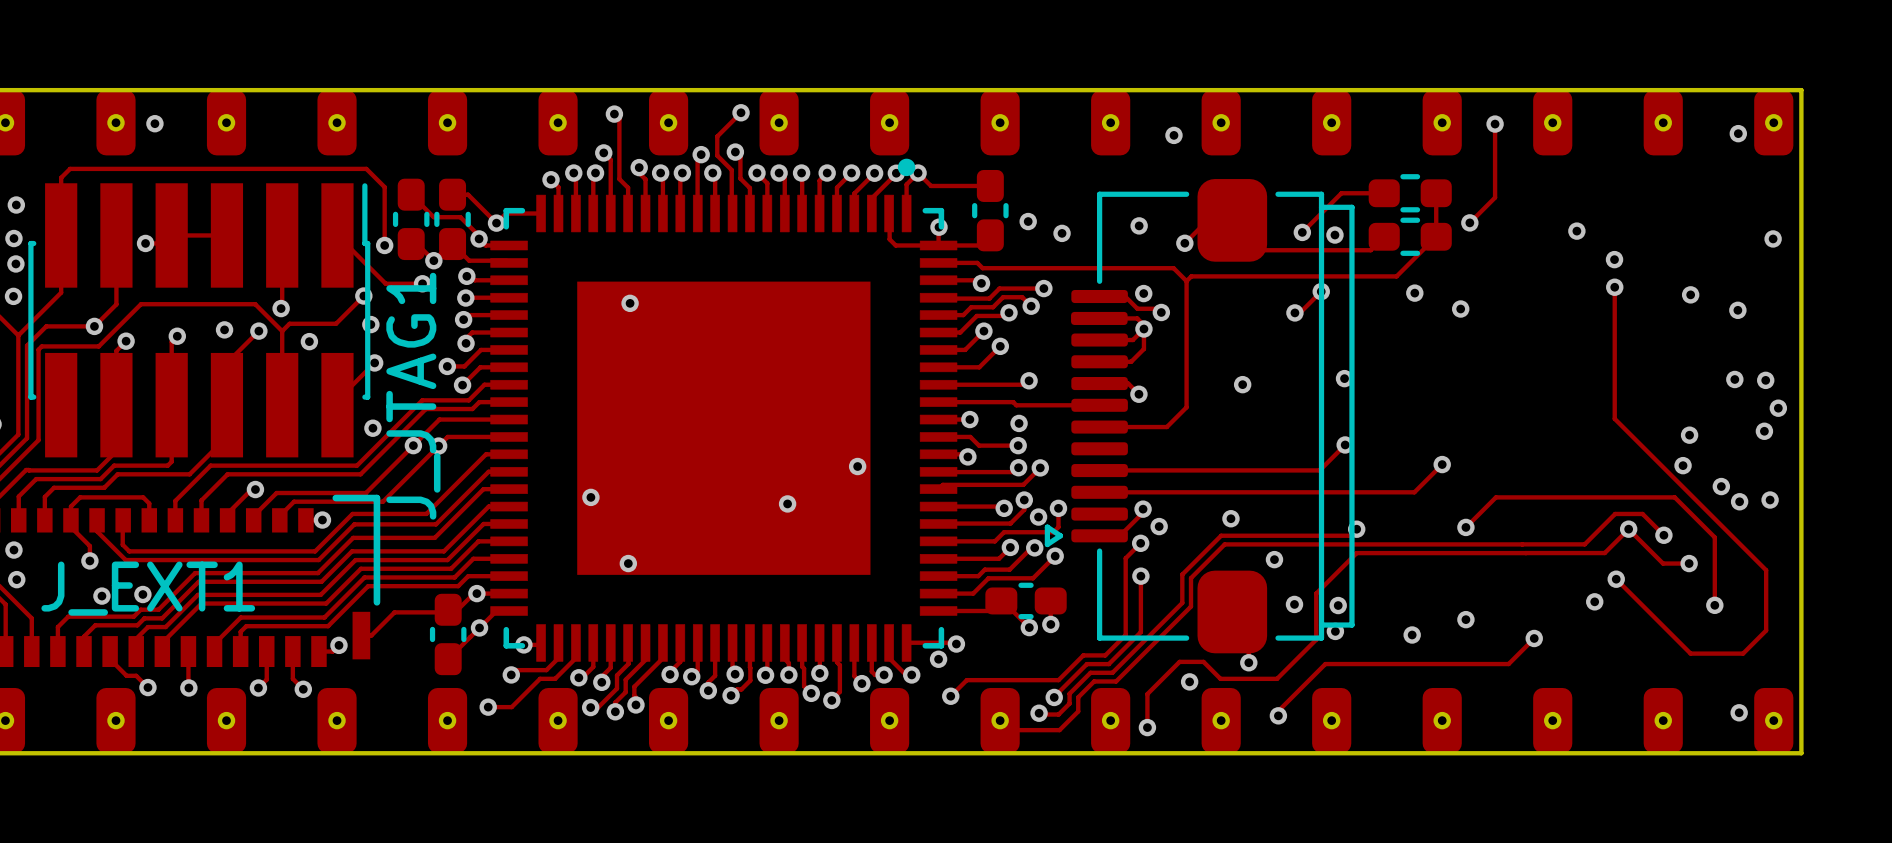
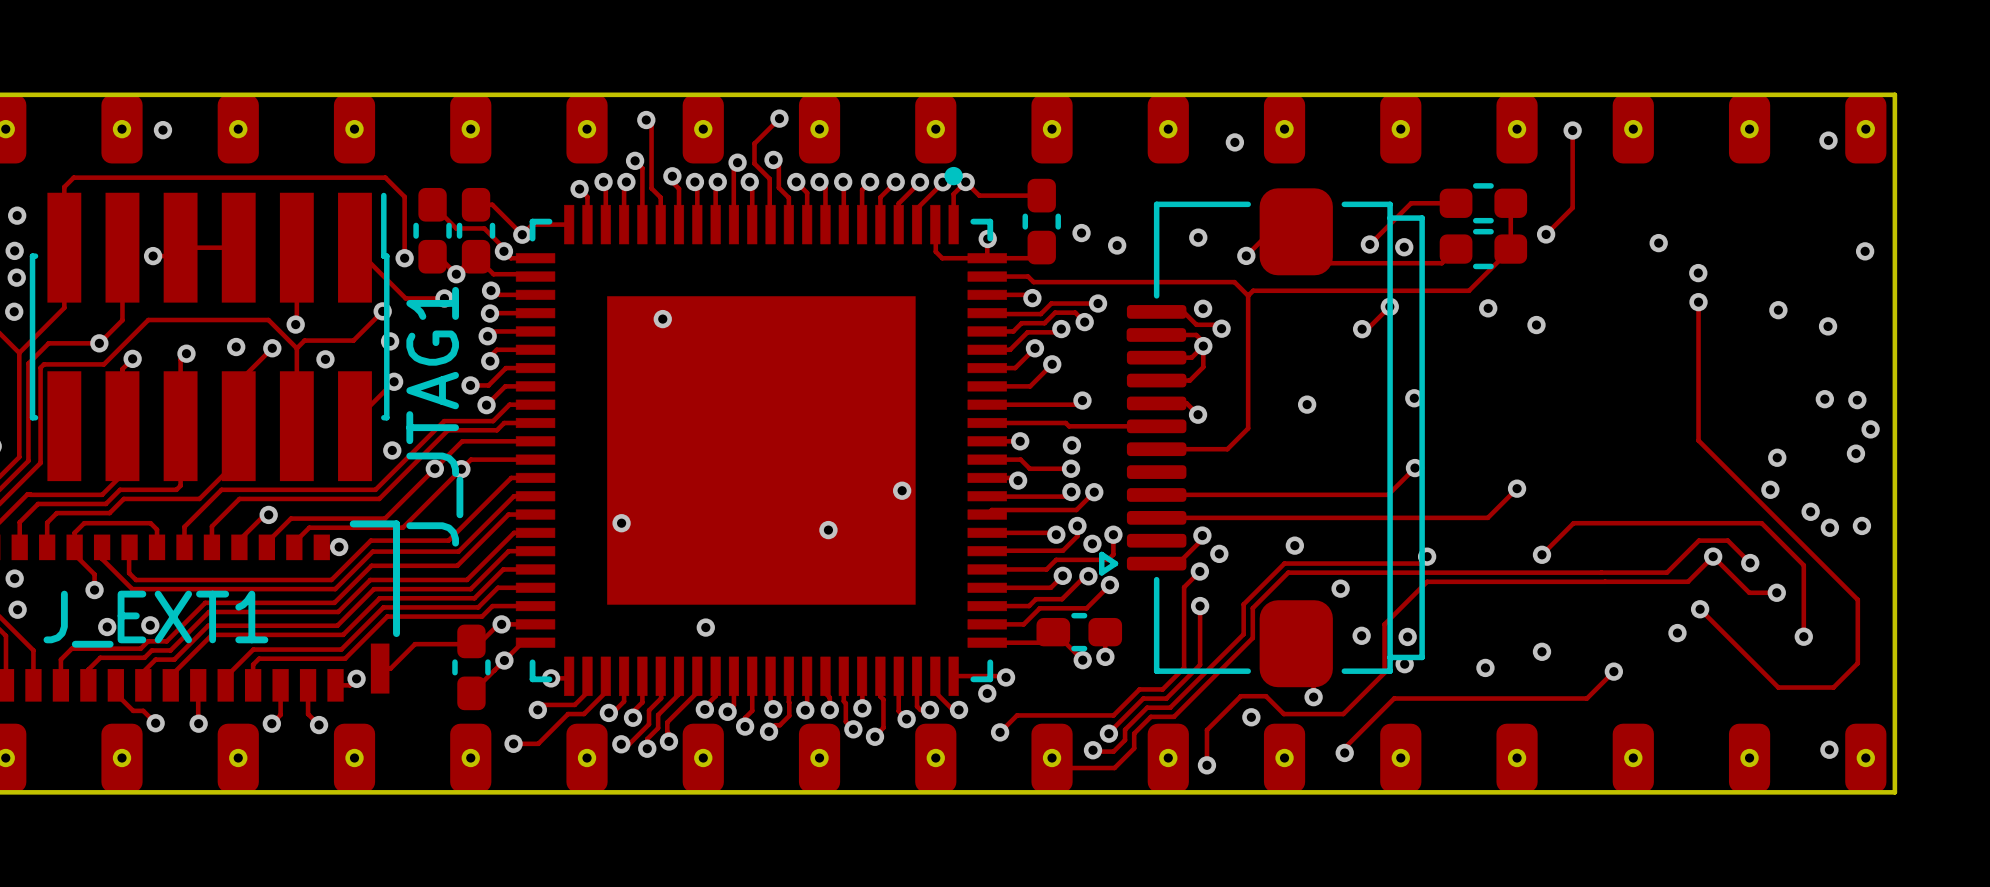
via position: (628, 563) -> (705, 627)

